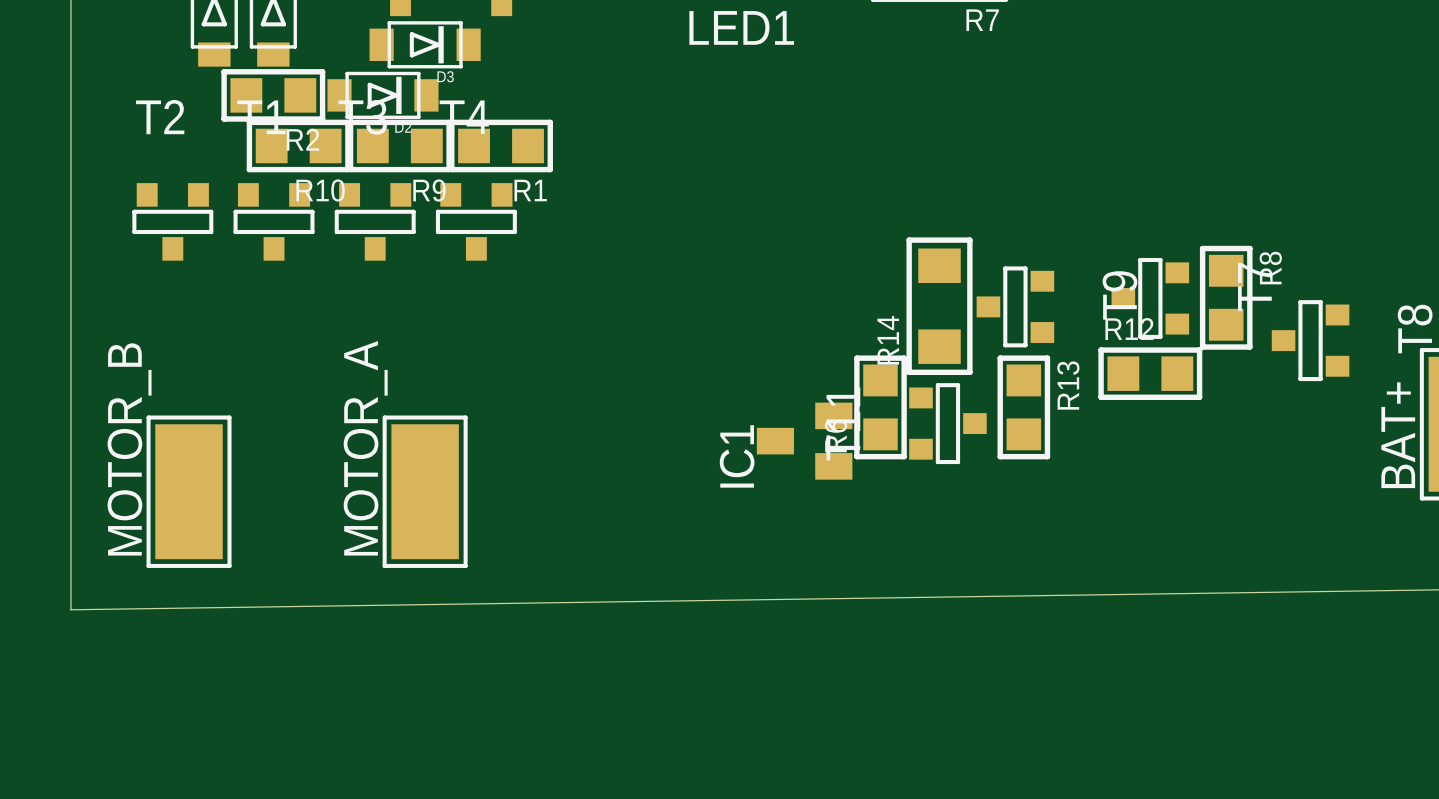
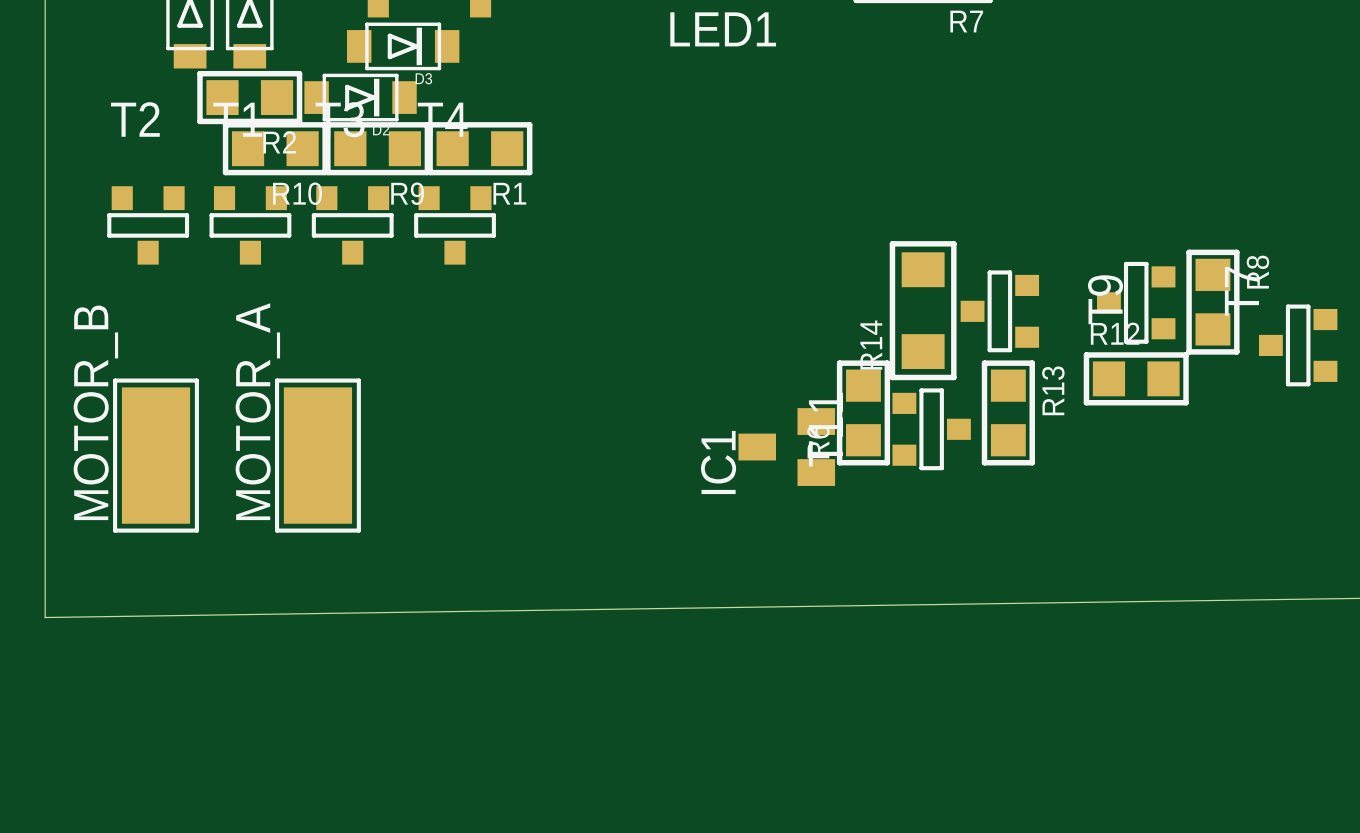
MOTOR_B position: (189, 491) -> (156, 455)
MOTOR_A position: (425, 491) -> (317, 455)

